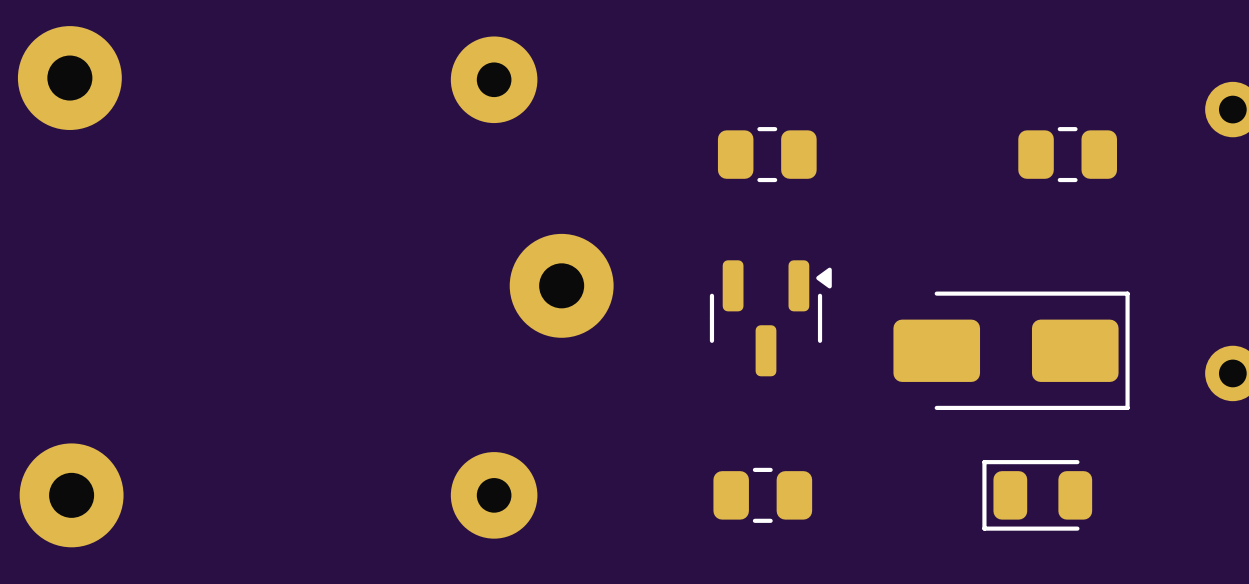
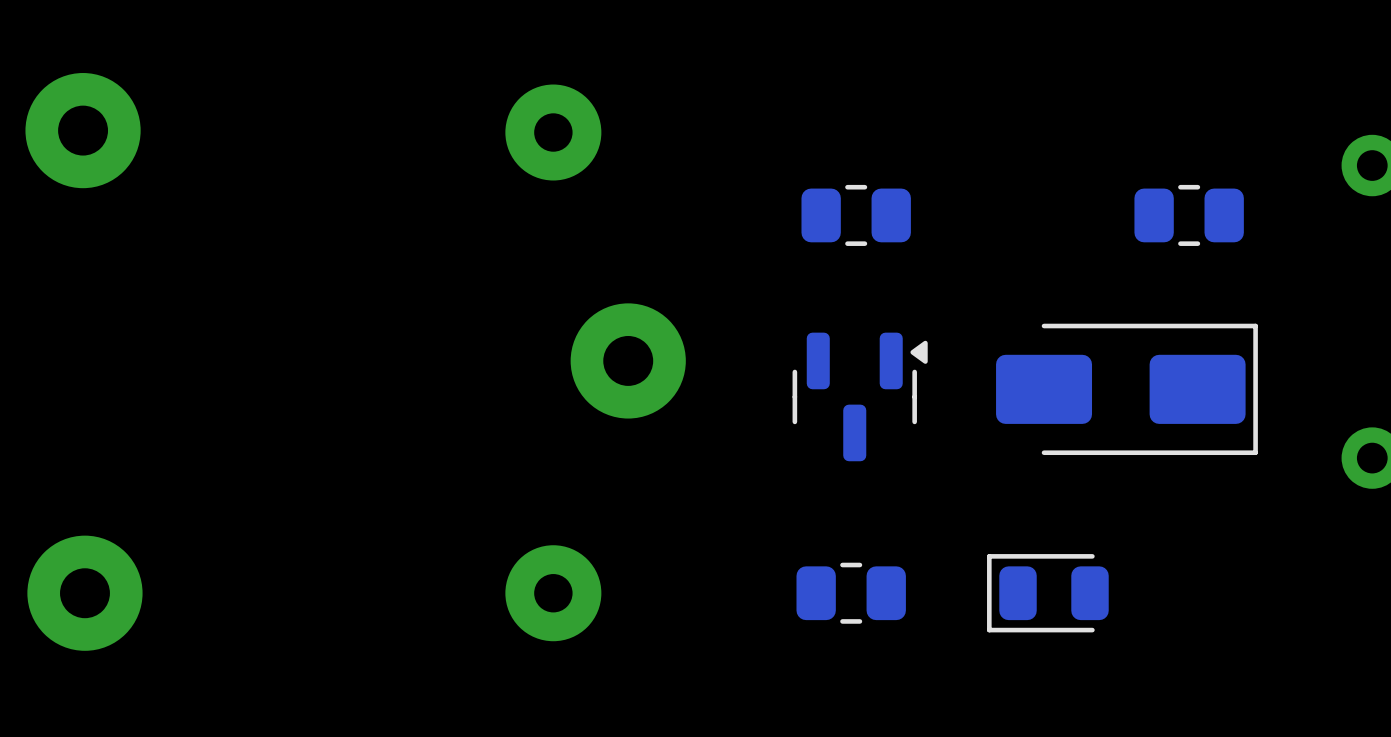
part position: (1011, 350) -> (1126, 389)
part position: (1037, 495) -> (1047, 593)

